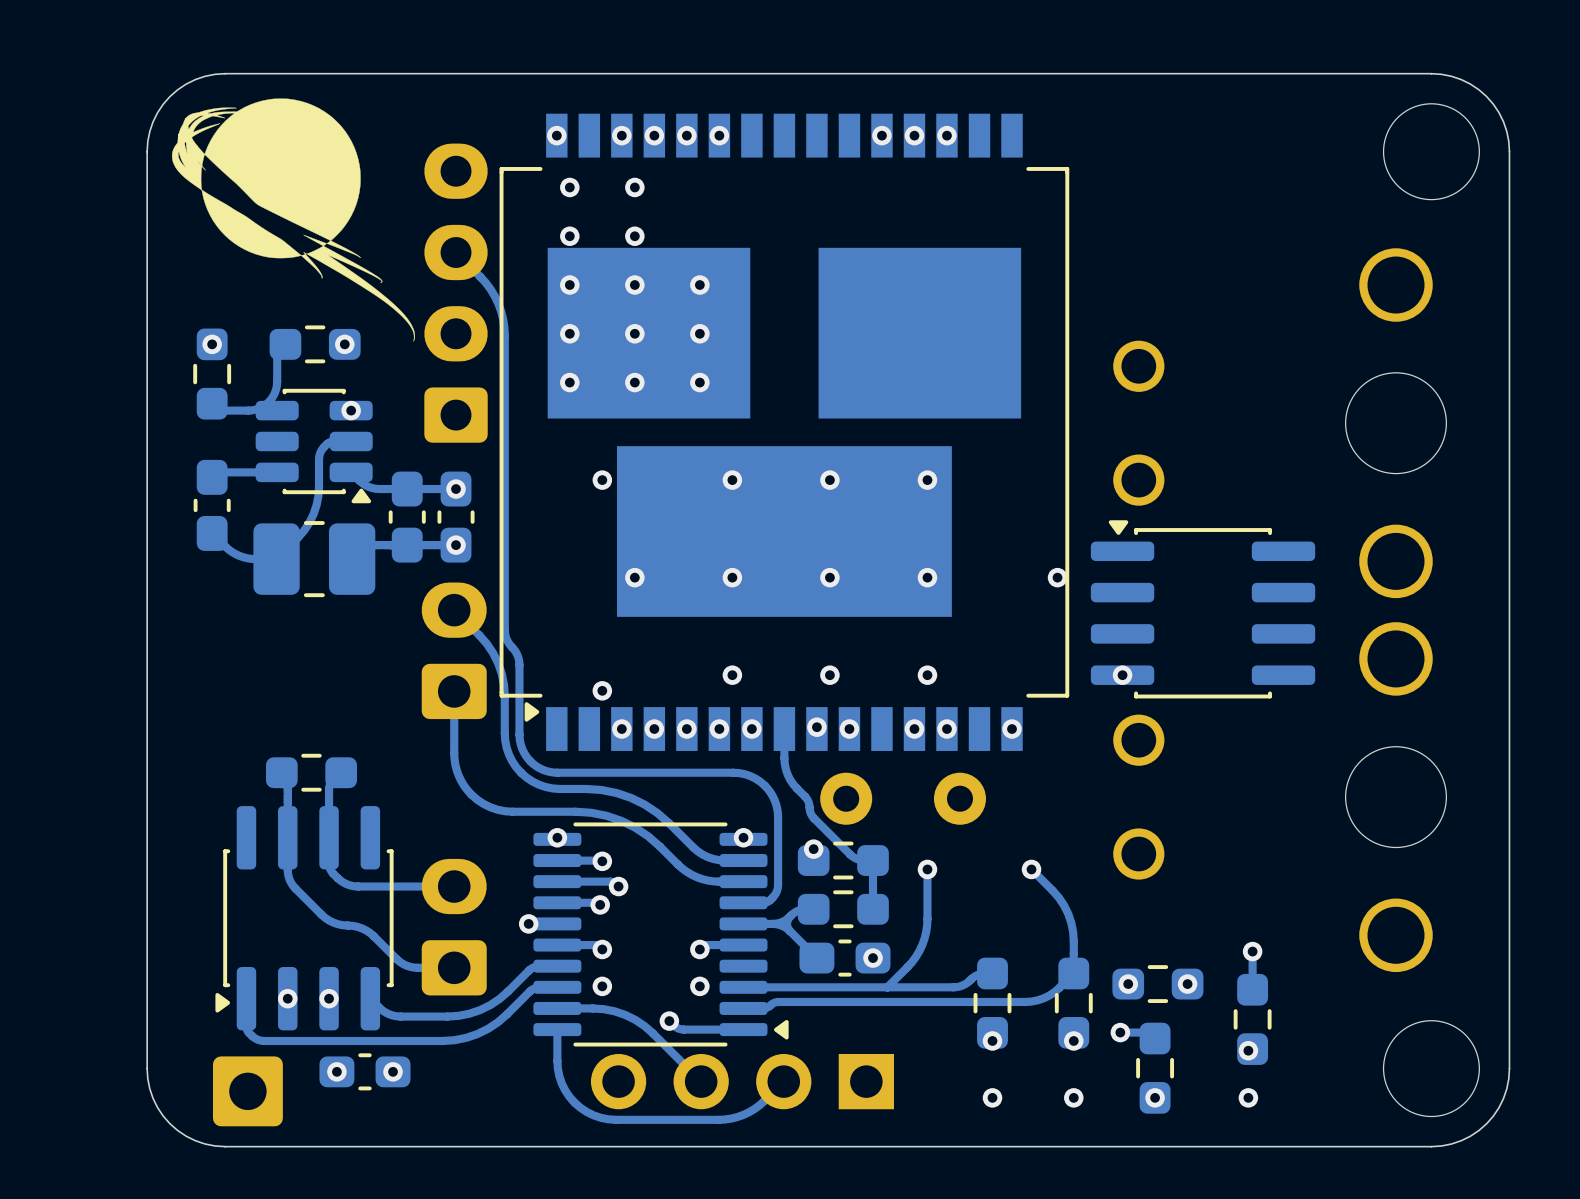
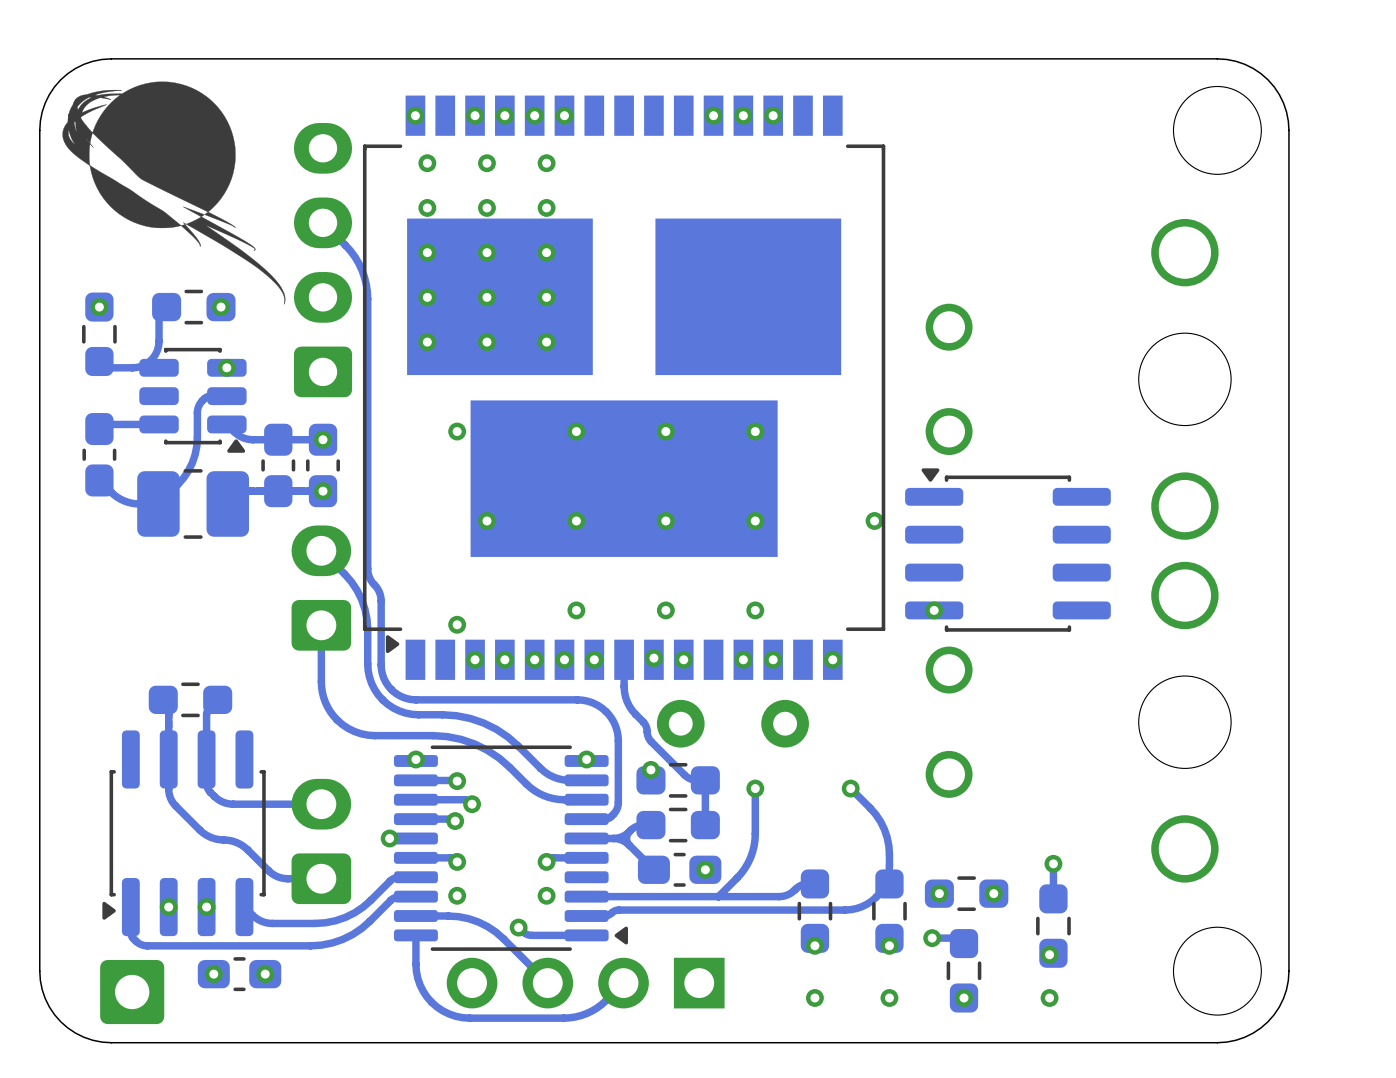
via: none -> (546, 163)
via: none -> (546, 207)

